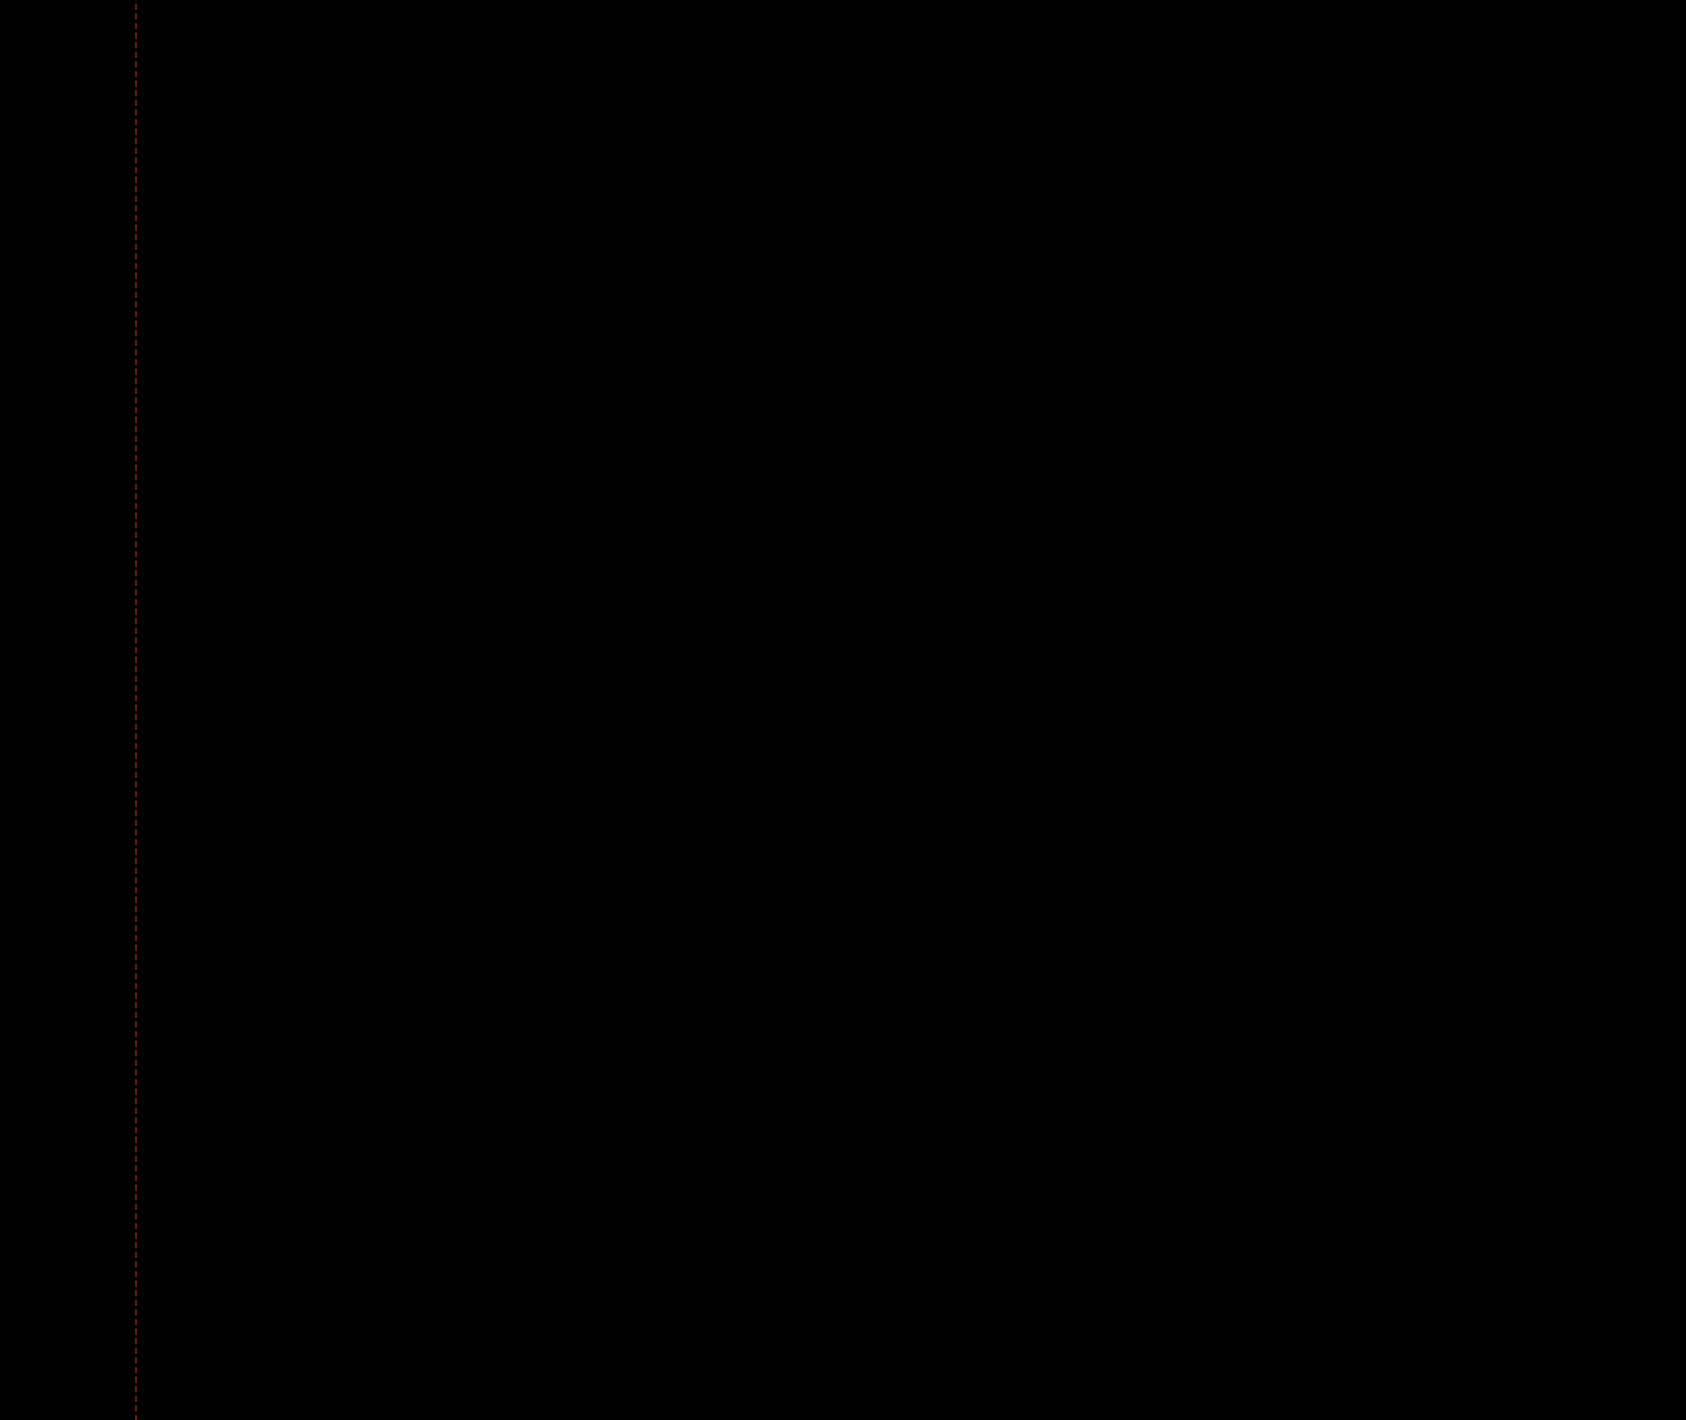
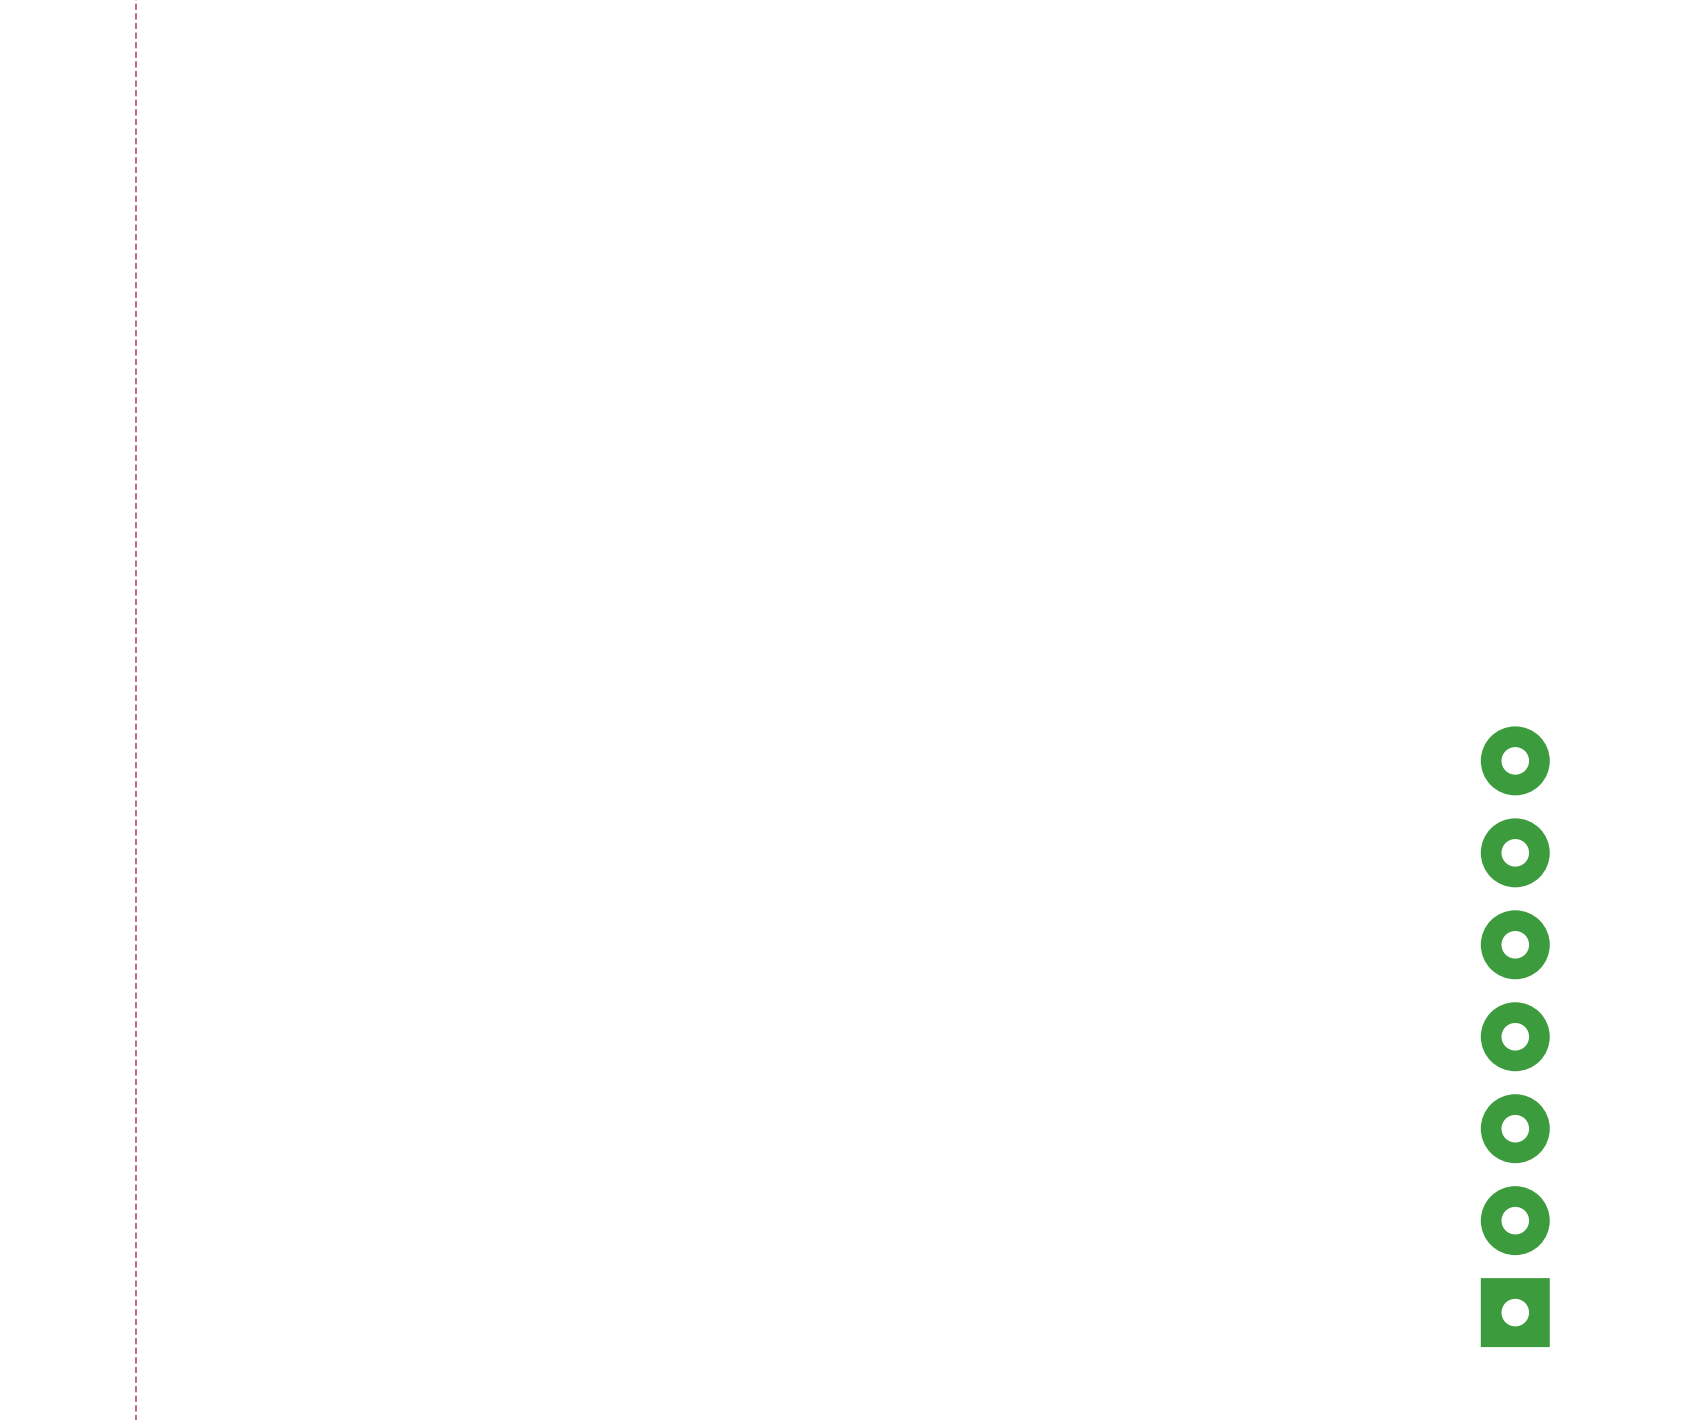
part: none -> (1515, 1036)

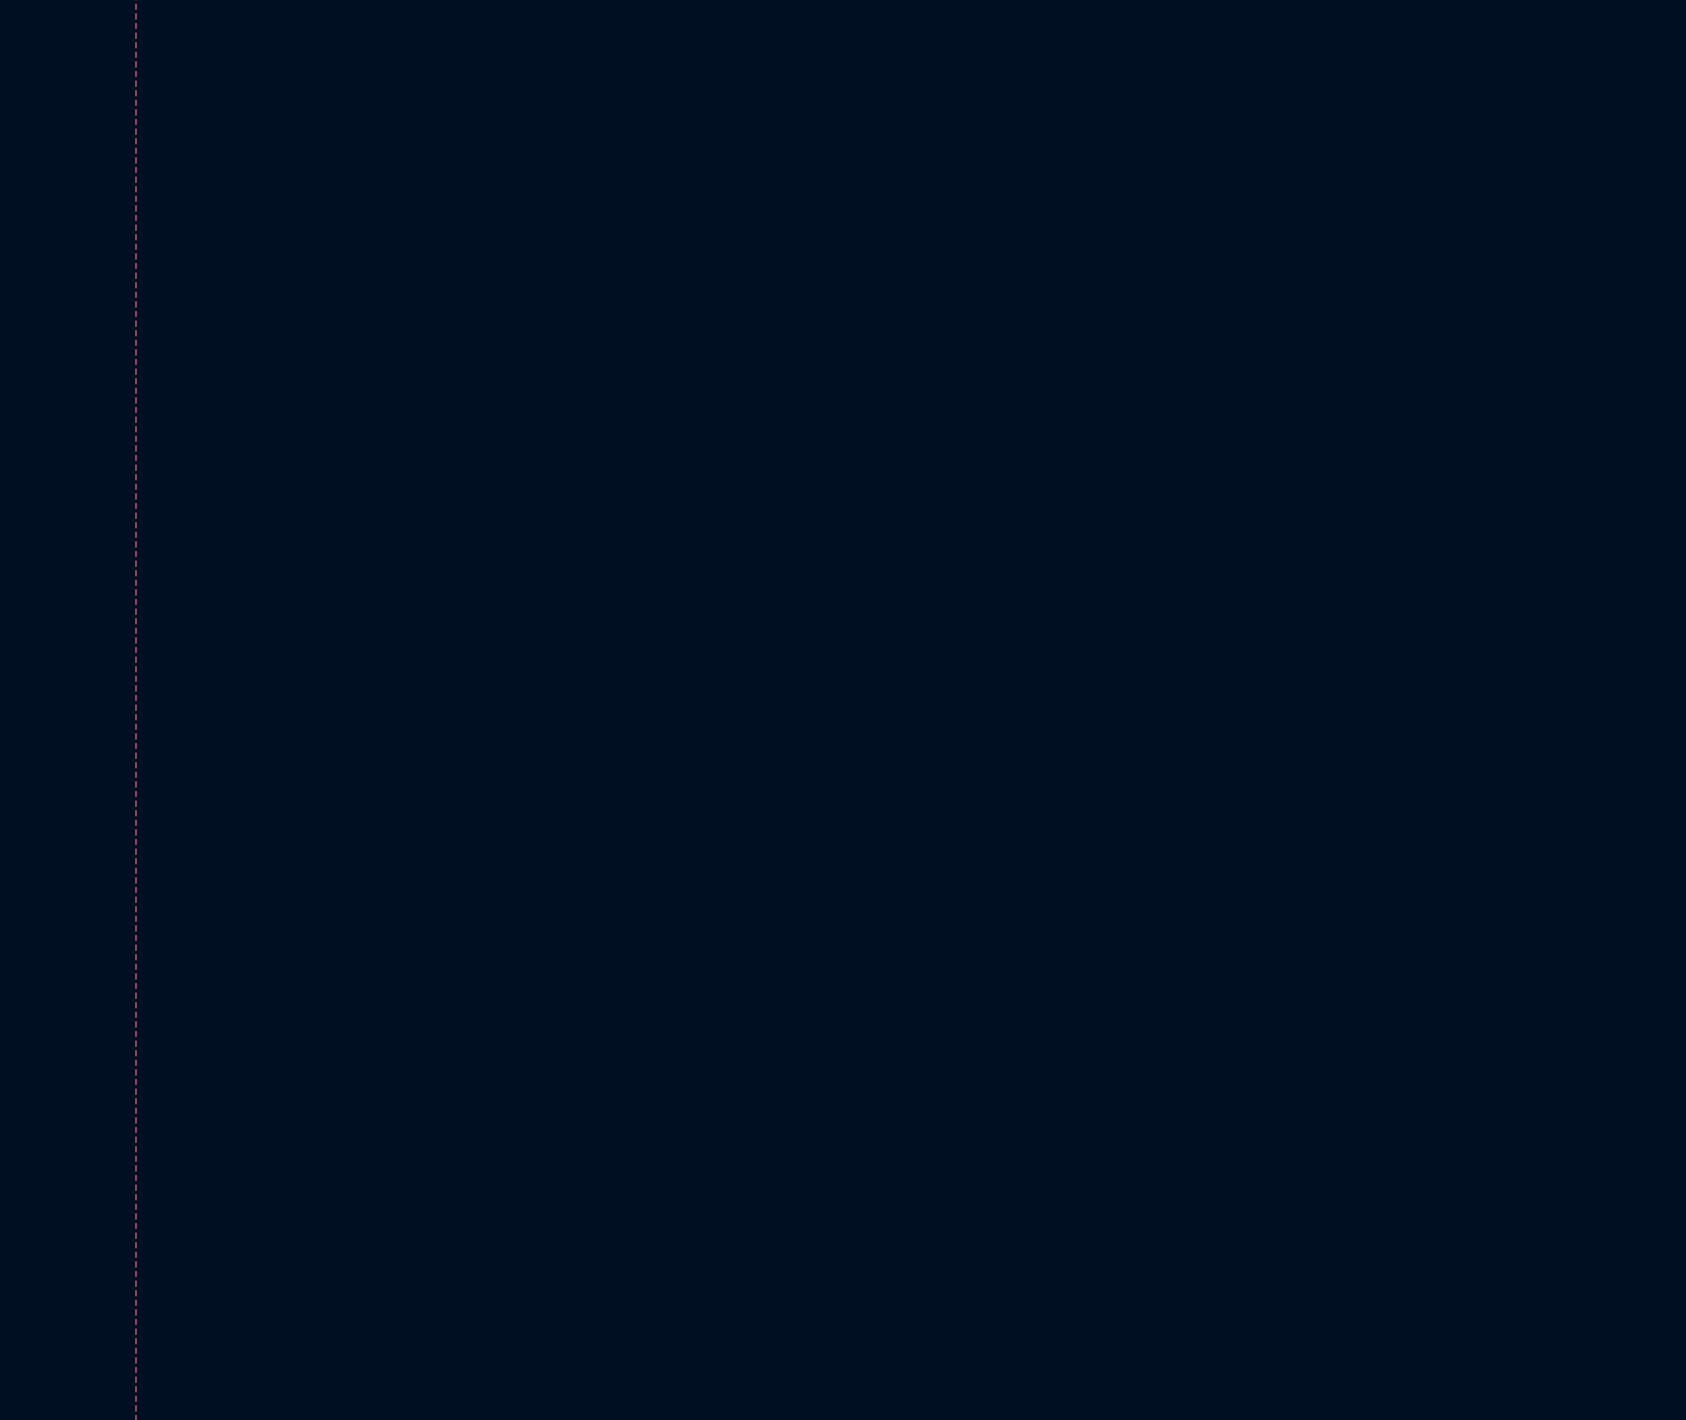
part: (1515, 1036) -> none

